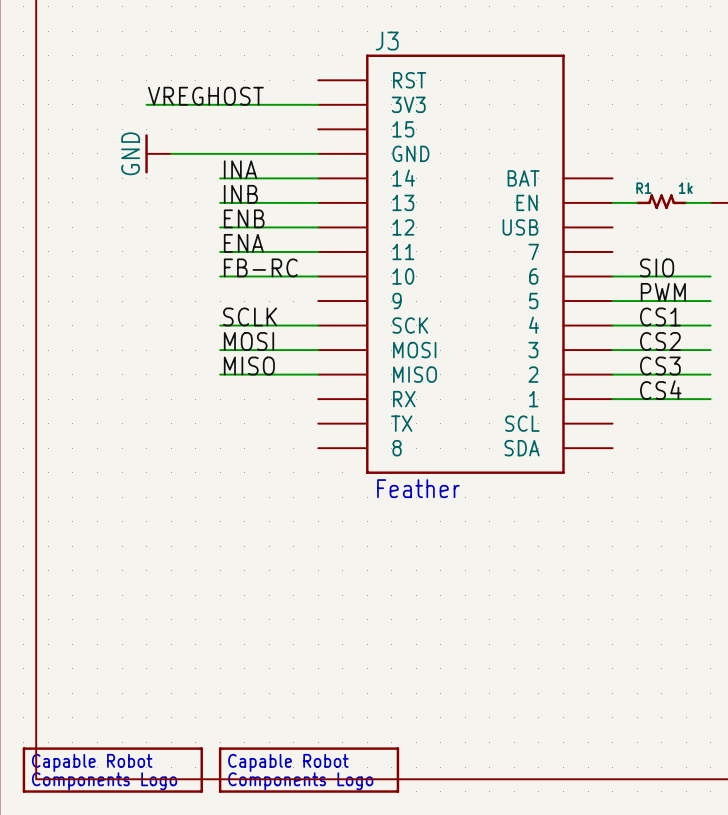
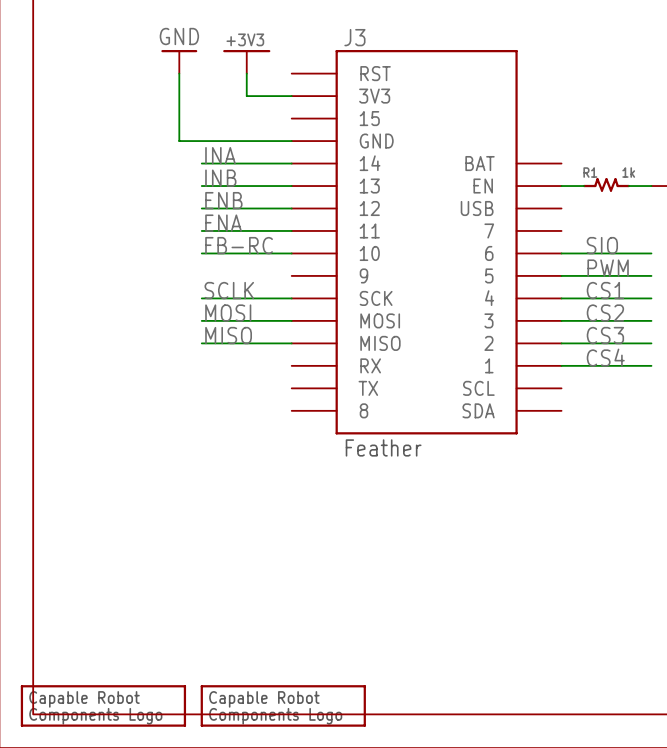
power symbol: none -> (246, 61)
label: VREGHOST (205, 96) -> none
wire: (146, 104) (269, 104) -> (246, 73) (246, 96)
power symbol rotation: 0° (146, 153) -> 90° clockwise (179, 51)
power symbol position: GND (158, 153) -> GND (179, 61)
wire: (171, 153) (195, 153) -> (179, 73) (179, 141)

